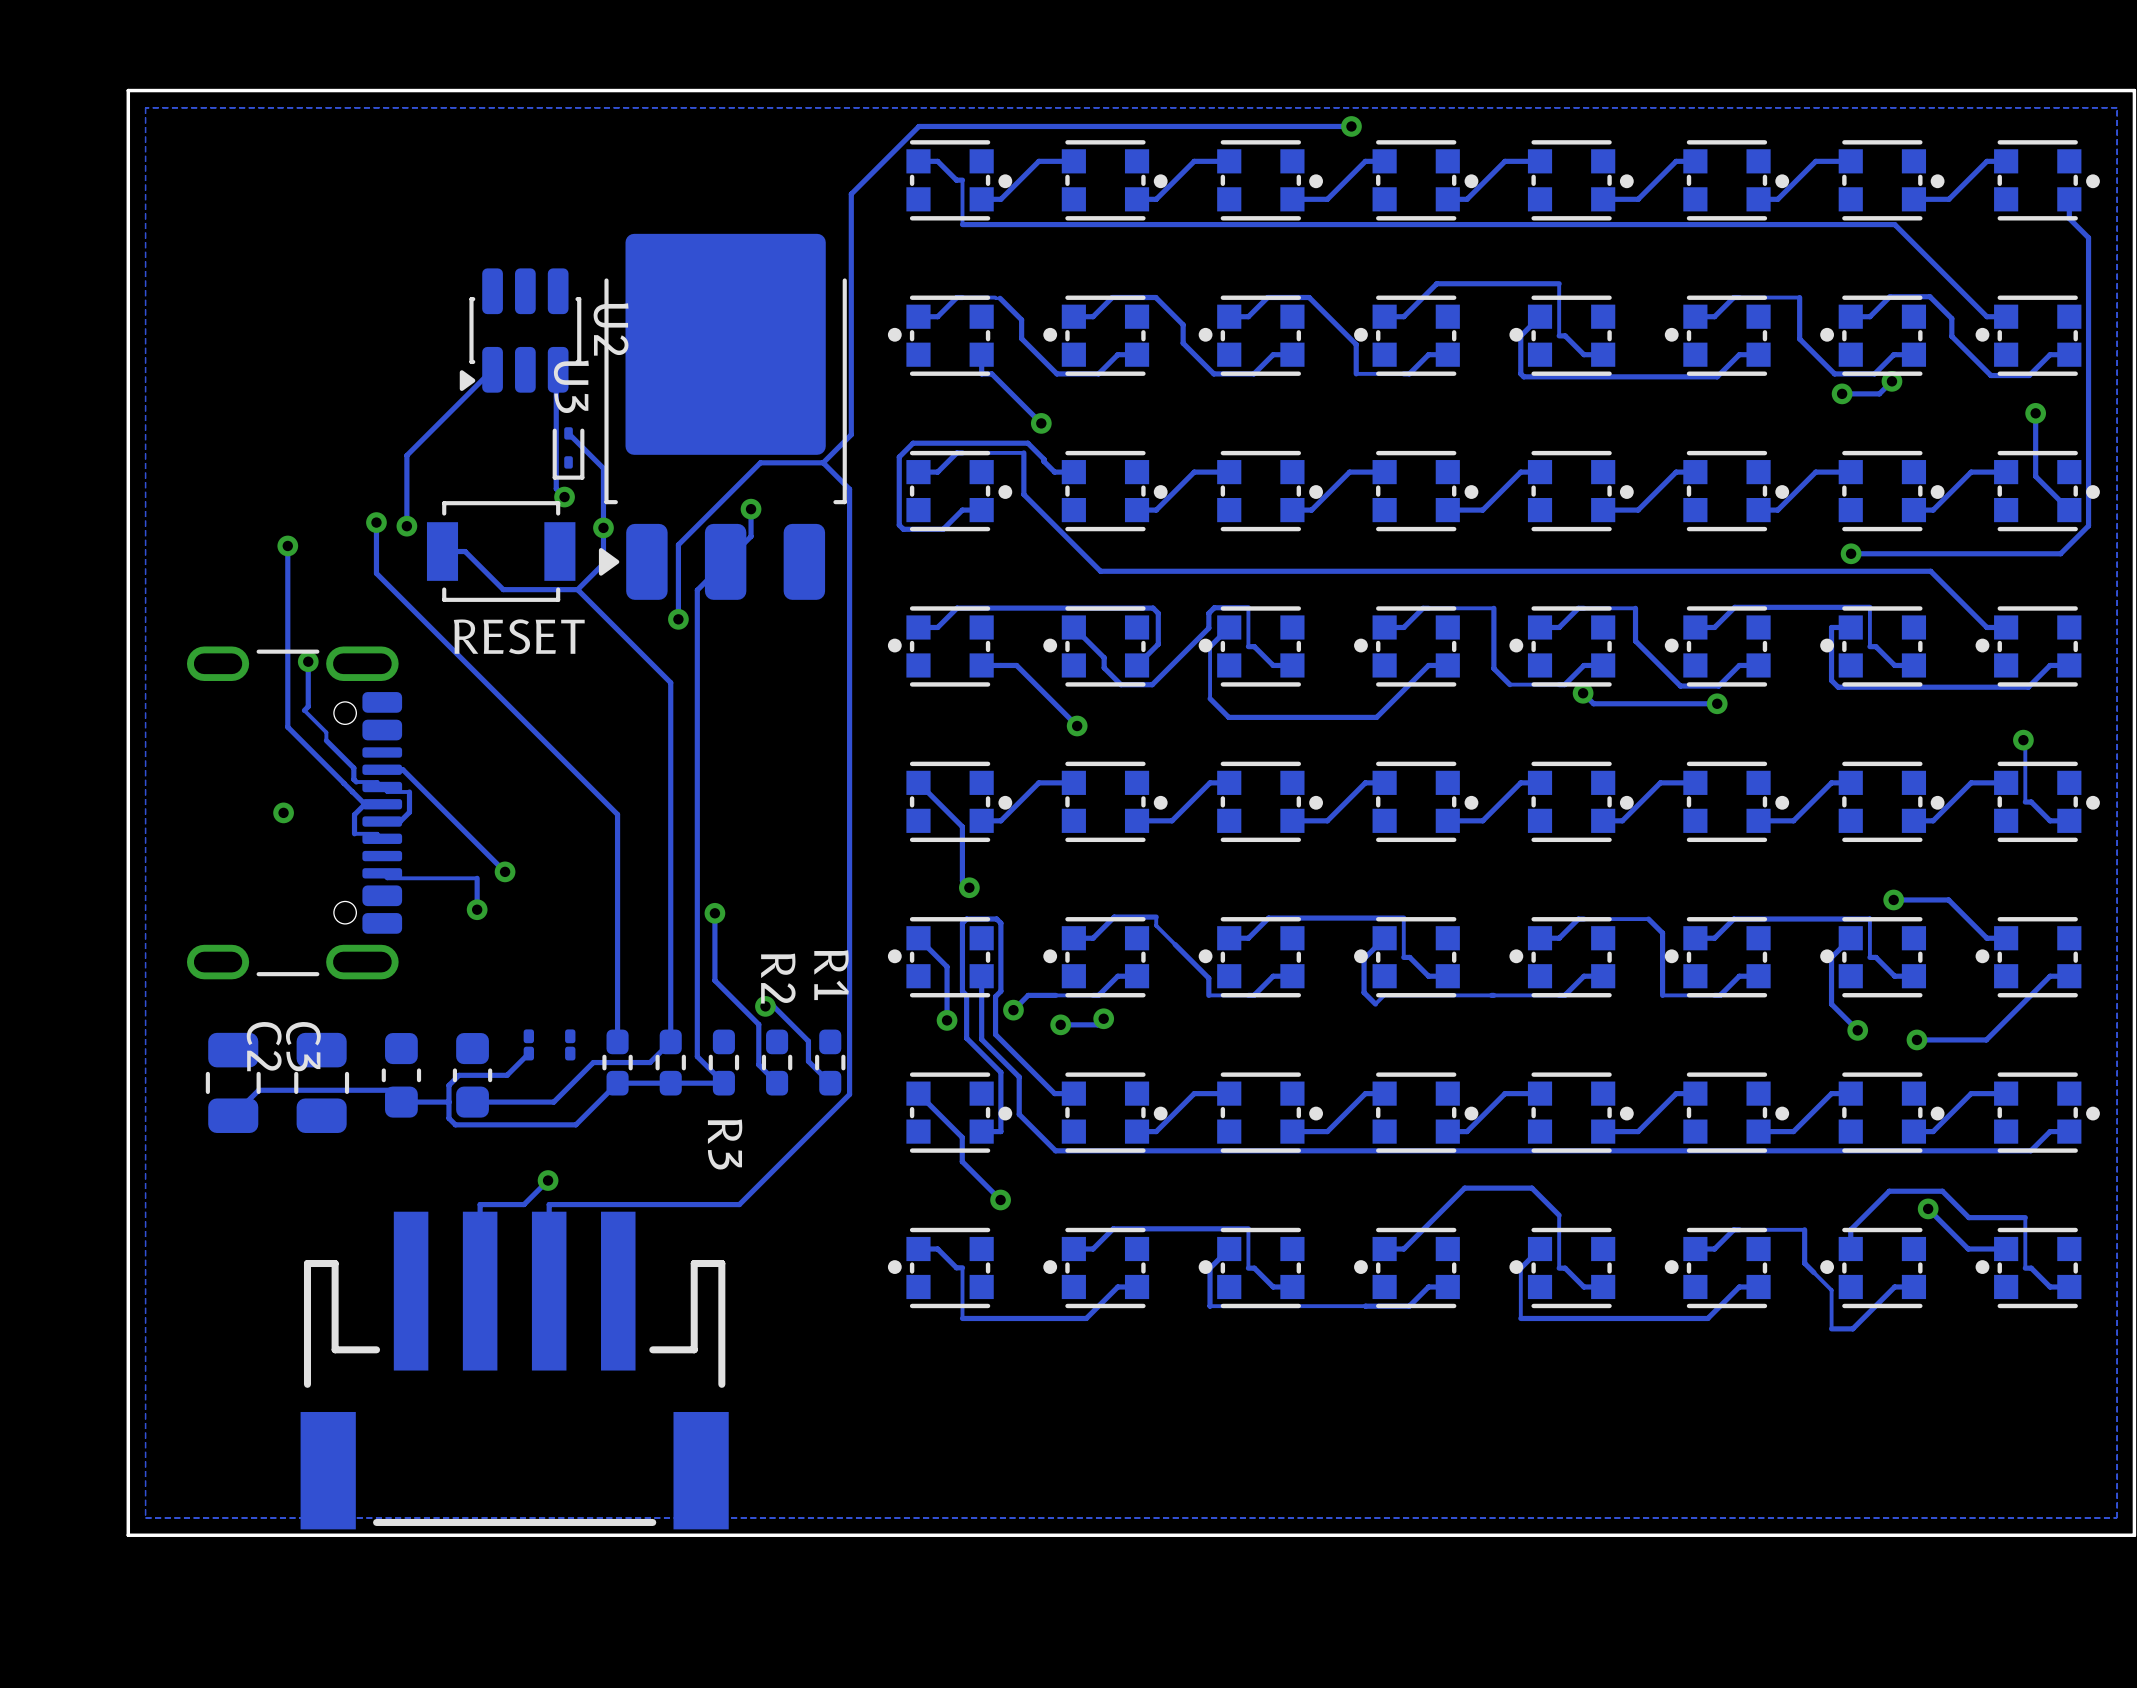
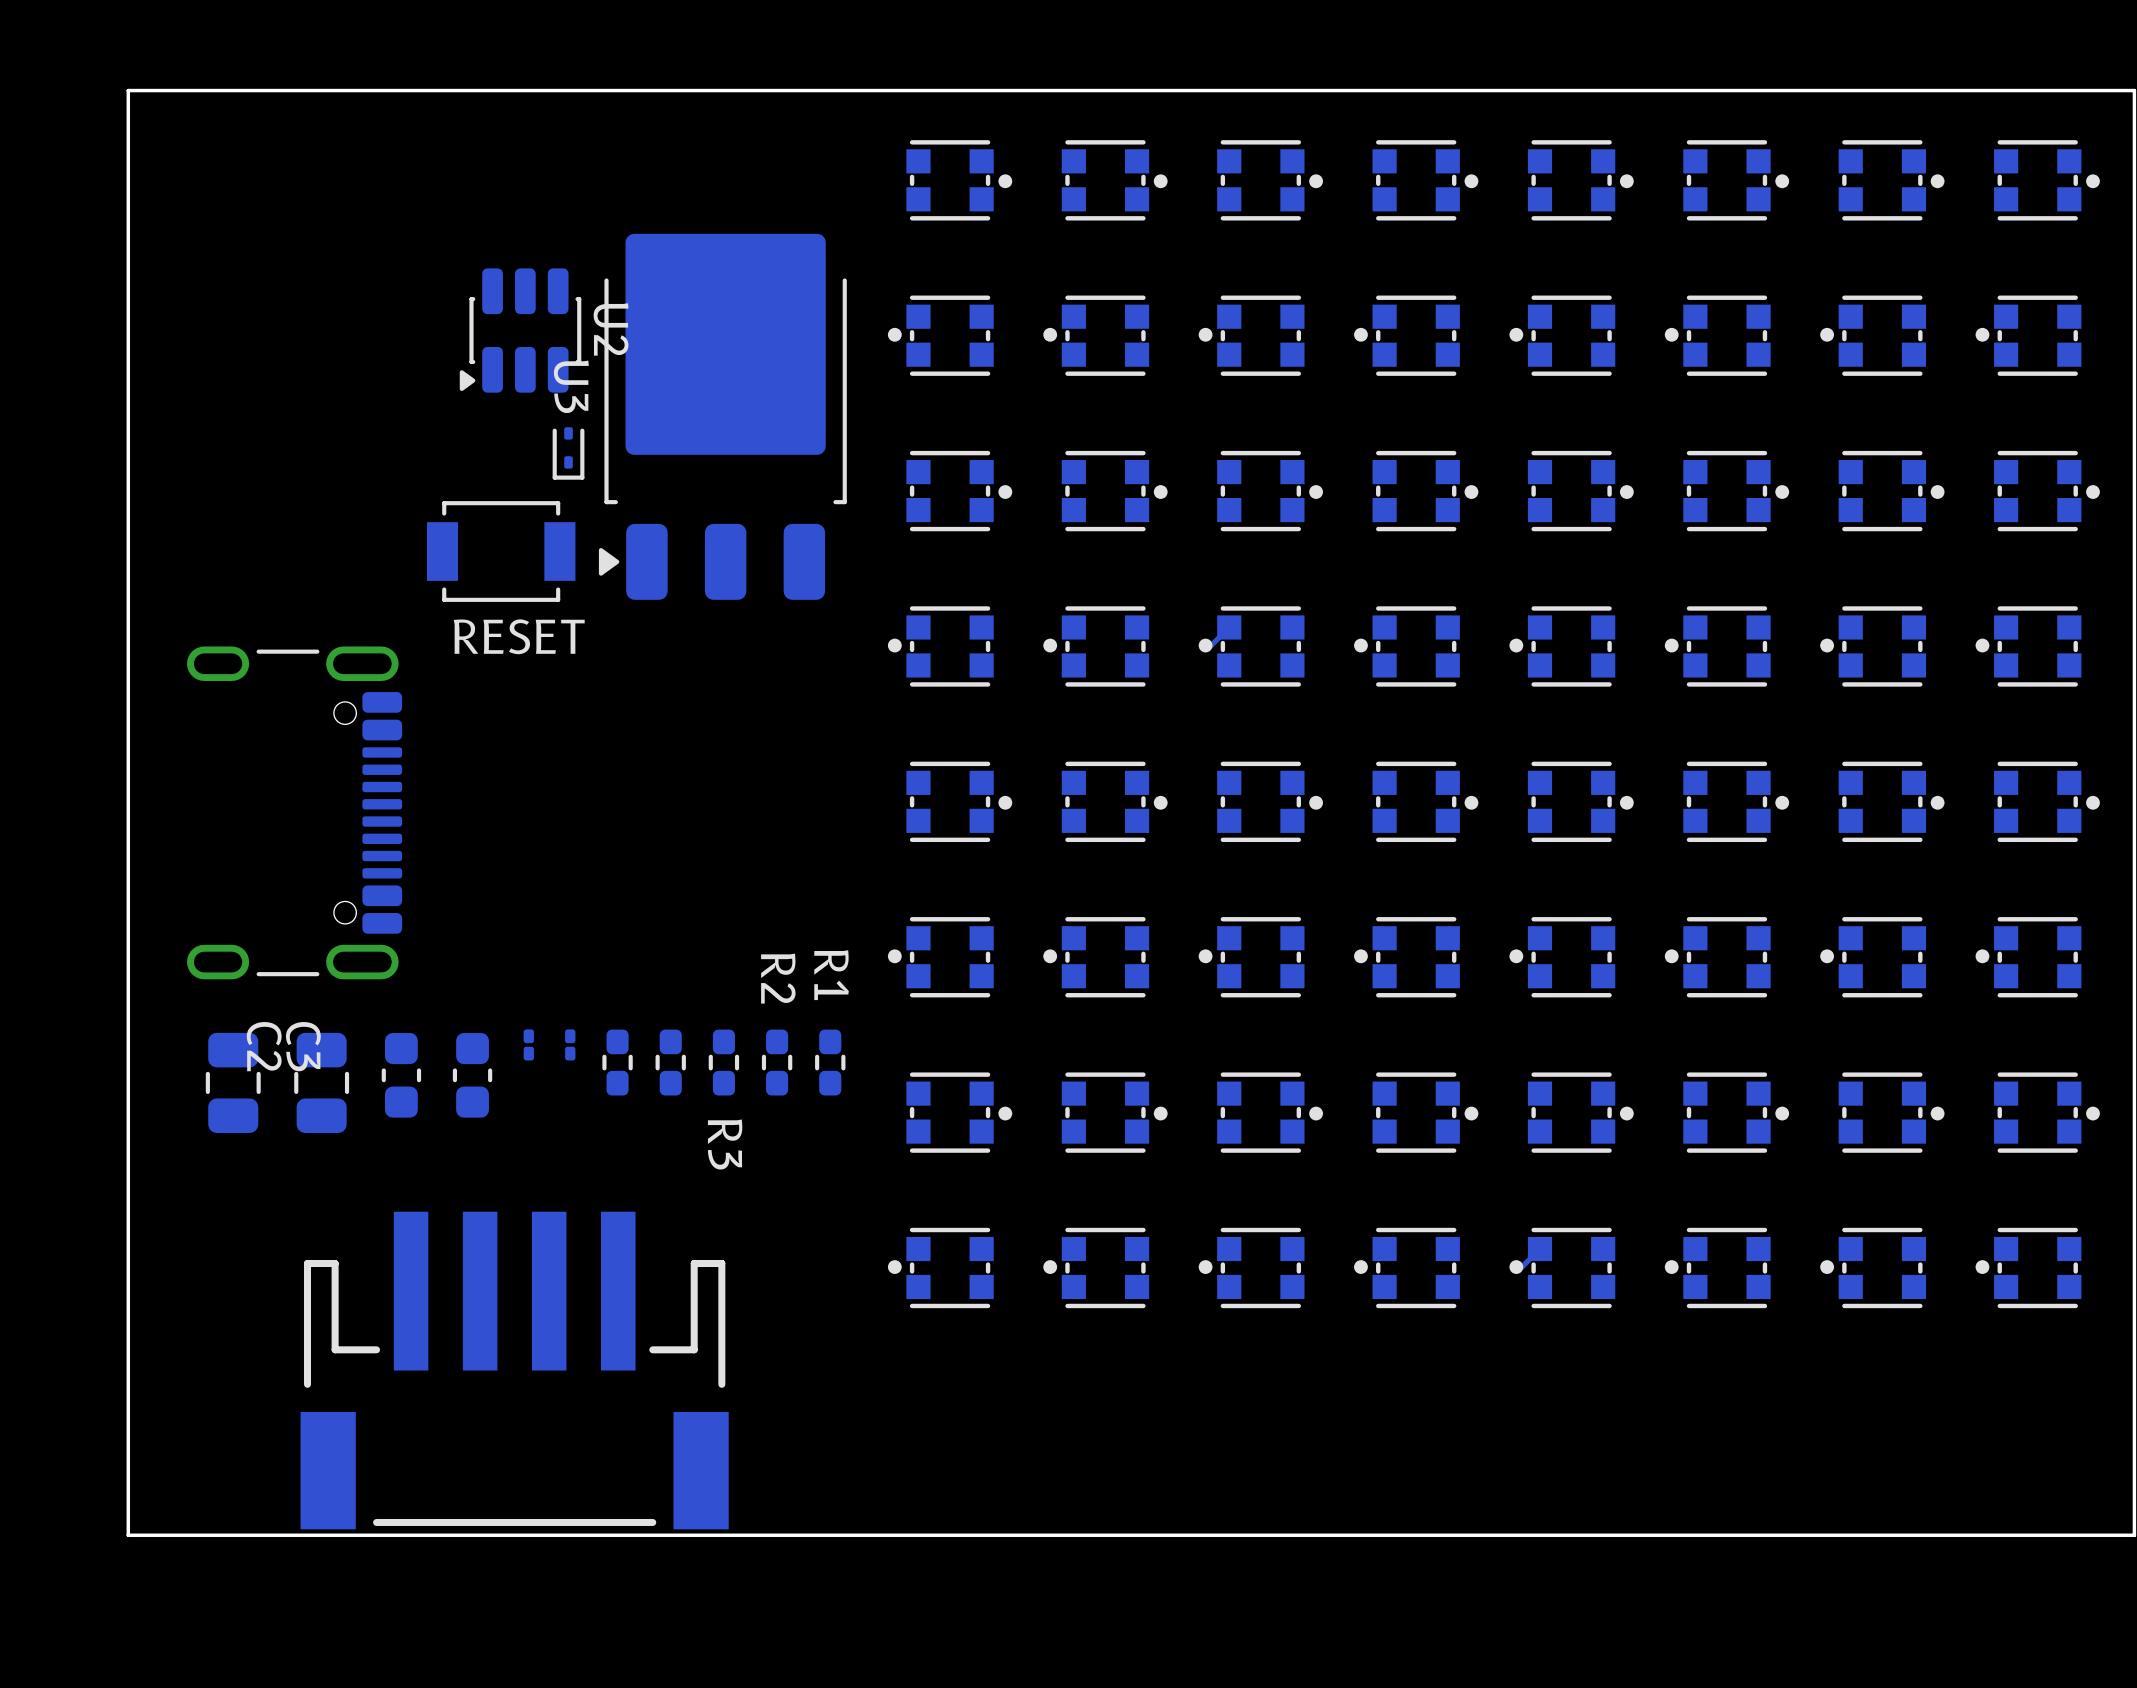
zone outline: (2117, 107) (145, 107) (145, 1517) (2117, 1517) (2117, 107) -> none
track: (1351, 126) (918, 126) (851, 194) (851, 434) (823, 462) -> none
via: (1351, 126) -> none
track: (918, 161) (937, 161) (956, 180) (962, 180) (962, 224) (1894, 224) (1986, 316) (2006, 316) -> none
track: (1073, 161) (1038, 161) (1000, 199) (981, 199) -> none
track: (1229, 161) (1194, 161) (1156, 199) (1137, 199) -> none
track: (1384, 161) (1365, 161) (1327, 199) (1292, 199) -> none
track: (1540, 161) (1505, 161) (1467, 199) (1447, 199) -> none
track: (1695, 161) (1676, 161) (1638, 199) (1603, 199) -> none
track: (1850, 161) (1815, 161) (1777, 199) (1758, 199) -> none
track: (2006, 161) (1986, 161) (1948, 199) (1913, 199) -> none
track: (2069, 199) (2069, 218) (2088, 237) (2088, 525) (2060, 553) (1851, 553) -> none
track: (918, 316) (937, 316) (956, 297) (1000, 298) (1021, 319) (1021, 338) (1056, 373) (1098, 373) (1117, 354) (1137, 354) -> none
track: (1073, 316) (1093, 316) (1112, 297) (1155, 297) (1183, 324) (1183, 343) (1213, 373) (1253, 373) (1273, 354) (1292, 354) -> none
track: (1229, 316) (1248, 316) (1267, 297) (1309, 297) (1356, 344) (1356, 373) (1409, 373) (1428, 354) (1447, 354) -> none
track: (1384, 316) (1403, 316) (1436, 283) (1559, 283) (1559, 335) (1565, 335) (1583, 354) (1603, 354) -> none
track: (1540, 316) (1520, 335) (1520, 373) (1523, 376) (1717, 376) (1739, 354) (1758, 354) -> none
track: (1695, 316) (1714, 316) (1733, 297) (1799, 297) (1799, 338) (1834, 373) (1874, 373) (1893, 354) (1913, 354) -> none
track: (1850, 316) (1869, 316) (1889, 296) (1929, 296) (1951, 318) (1951, 336) (1990, 375) (2029, 375) (2050, 354) (2069, 354) -> none
track: (981, 354) (981, 373) (991, 373) (1041, 423) -> none
track: (492, 369) (406, 455) (406, 526) -> none
track: (558, 369) (556, 371) (556, 488) (564, 497) -> none
track: (1891, 381) (1879, 393) (1842, 393) -> none
via: (1891, 381) -> none
via: (1842, 393) -> none
track: (2035, 413) (2035, 476) (2069, 510) -> none
via: (2035, 413) -> none
via: (1041, 423) -> none
track: (568, 433) (603, 468) (603, 563) (577, 589) -> none
track: (823, 462) (849, 489) (849, 1094) (739, 1204) (549, 1204) (549, 1291) -> none
track: (823, 462) (760, 462) (678, 544) (678, 619) -> none
track: (918, 472) (937, 472) (956, 452) (1023, 452) (1023, 494) (1100, 571) (1930, 571) (1986, 627) (2006, 627) -> none
track: (1073, 472) (1054, 472) (1027, 443) (913, 443) (899, 457) (899, 525) (903, 529) (943, 529) (962, 510) (981, 510) -> none
track: (1229, 472) (1194, 472) (1156, 510) (1137, 510) -> none
track: (1384, 472) (1349, 472) (1311, 510) (1292, 510) -> none
track: (1540, 472) (1520, 472) (1482, 510) (1447, 510) -> none
track: (1695, 472) (1676, 472) (1638, 510) (1603, 510) -> none
track: (1850, 472) (1815, 472) (1777, 510) (1758, 510) -> none
track: (2006, 472) (1971, 472) (1933, 510) (1913, 510) -> none
via: (564, 497) -> none
track: (751, 509) (751, 536) (697, 590) (697, 1056) (723, 1083) (617, 1083) (575, 1124) (455, 1124) (448, 1118) (448, 1085) (459, 1075) (507, 1075) (528, 1053) -> none
via: (751, 509) -> none
track: (376, 522) (376, 573) (617, 814) (617, 1041) -> none
via: (376, 522) -> none
via: (406, 526) -> none
via: (603, 527) -> none
track: (287, 545) (287, 727) (364, 804) -> none
via: (287, 545) -> none
track: (442, 551) (465, 551) (503, 589) (577, 589) -> none
via: (1851, 553) -> none
track: (577, 589) (670, 682) (670, 1041) (650, 1062) (593, 1062) (553, 1102) (472, 1102) -> none
via: (678, 619) -> none
track: (918, 627) (937, 627) (957, 608) (1153, 608) (1158, 613) (1158, 644) (1137, 665) -> none
track: (1073, 627) (1104, 657) (1104, 667) (1121, 684) (1152, 684) (1208, 628) (1208, 613) (1214, 607) (1248, 607) (1248, 646) (1254, 646) (1273, 665) (1292, 665) -> none
track: (1384, 627) (1403, 627) (1423, 608) (1493, 608) (1493, 668) (1509, 684) (1564, 684) (1583, 665) (1603, 665) -> none
track: (1540, 627) (1559, 627) (1578, 608) (1635, 608) (1635, 641) (1680, 686) (1718, 686) (1739, 665) (1758, 665) -> none
track: (1695, 627) (1714, 627) (1734, 607) (1869, 607) (1869, 646) (1875, 646) (1894, 665) (1913, 665) -> none
track: (1850, 627) (1831, 627) (1831, 680) (1838, 687) (2028, 687) (2050, 665) (2069, 665) -> none
track: (1210, 646) (1210, 698) (1228, 717) (1376, 717) (1428, 665) (1447, 665) -> none
track: (308, 661) (308, 706) (304, 710) (326, 732) (326, 740) (353, 768) (353, 779) (356, 782) (377, 782) (387, 791) (409, 791) (409, 812) (400, 821) (382, 821) -> none
via: (308, 661) -> none
track: (981, 665) (1016, 665) (1077, 725) -> none
track: (1583, 693) (1593, 703) (1717, 703) -> none
via: (1583, 693) -> none
via: (1717, 703) -> none
via: (1077, 725) -> none
track: (2023, 740) (2025, 740) (2025, 802) (2031, 802) (2050, 820) (2069, 820) -> none
via: (2023, 740) -> none
track: (382, 769) (402, 769) (505, 871) -> none
track: (918, 782) (962, 826) (962, 880) (969, 887) -> none
track: (1073, 782) (1038, 782) (1000, 820) (981, 820) -> none
track: (1229, 782) (1210, 782) (1172, 820) (1137, 820) -> none
track: (1384, 782) (1365, 782) (1327, 820) (1292, 820) -> none
track: (1540, 782) (1520, 782) (1482, 820) (1447, 820) -> none
track: (1695, 782) (1660, 782) (1622, 820) (1603, 820) -> none
track: (1850, 782) (1831, 782) (1793, 820) (1758, 820) -> none
track: (2006, 782) (1971, 782) (1933, 820) (1913, 820) -> none
track: (364, 804) (354, 814) (354, 833) (377, 833) (382, 838) -> none
via: (283, 812) -> none
via: (505, 871) -> none
track: (382, 873) (387, 878) (477, 878) (477, 909) -> none
via: (969, 887) -> none
track: (1893, 899) (1948, 899) (1986, 938) (2006, 938) -> none
via: (1893, 899) -> none
via: (477, 909) -> none
track: (714, 913) (714, 980) (758, 1024) (758, 1064) (777, 1083) -> none
via: (714, 913) -> none
track: (918, 938) (947, 966) (947, 1020) -> none
track: (1073, 938) (1093, 938) (1114, 917) (1156, 917) (1156, 925) (1208, 978) (1208, 995) (1254, 995) (1273, 976) (1292, 976) -> none
track: (1229, 938) (1248, 938) (1268, 918) (1403, 918) (1403, 957) (1409, 957) (1428, 976) (1447, 976) -> none
track: (1384, 938) (1364, 958) (1364, 992) (1375, 1004) (1384, 995) (1564, 995) (1583, 976) (1603, 976) -> none
track: (1540, 938) (1559, 938) (1578, 919) (1648, 919) (1662, 933) (1662, 995) (1720, 995) (1739, 976) (1758, 976) -> none
track: (1695, 938) (1714, 938) (1733, 919) (1869, 919) (1869, 957) (1875, 957) (1894, 976) (1913, 976) -> none
track: (1850, 938) (1831, 957) (1831, 1004) (1857, 1030) -> none
track: (981, 976) (981, 1039) (1019, 1077) (1019, 1114) (1055, 1150) (2030, 1150) (2050, 1131) (2069, 1131) -> none
track: (1137, 976) (1117, 976) (1098, 995) (1028, 995) (1013, 1010) -> none
track: (2069, 976) (2050, 976) (1986, 1039) (1916, 1039) -> none
track: (765, 1006) (773, 1006) (808, 1041) (808, 1061) (830, 1083) -> none
via: (765, 1006) -> none
via: (1013, 1010) -> none
track: (1103, 1018) (1097, 1024) (1060, 1024) -> none
via: (1103, 1018) -> none
via: (947, 1020) -> none
via: (1060, 1024) -> none
via: (1857, 1030) -> none
via: (1916, 1039) -> none
track: (918, 1093) (962, 1137) (962, 1161) (1000, 1199) -> none
track: (1073, 1093) (1054, 1093) (995, 1034) (995, 996) (1000, 991) (1000, 923) (996, 919) (966, 919) (962, 923) (962, 991) (966, 995) (966, 1038) (1000, 1072) (1000, 1131) (981, 1131) -> none
track: (1229, 1093) (1194, 1093) (1156, 1131) (1137, 1131) -> none
track: (1384, 1093) (1365, 1093) (1327, 1131) (1292, 1131) -> none
track: (1540, 1093) (1505, 1093) (1467, 1131) (1447, 1131) -> none
track: (1695, 1093) (1676, 1093) (1638, 1131) (1603, 1131) -> none
track: (1850, 1093) (1831, 1093) (1793, 1131) (1758, 1131) -> none
track: (2006, 1093) (1971, 1093) (1933, 1131) (1913, 1131) -> none
track: (448, 1102) (401, 1102) (389, 1090) (258, 1090) (233, 1115) -> none
track: (548, 1180) (524, 1204) (480, 1204) (480, 1291) -> none
via: (548, 1180) -> none
via: (1000, 1199) -> none
track: (1928, 1208) (1968, 1249) (2006, 1249) -> none
via: (1928, 1208) -> none
track: (918, 1249) (937, 1249) (956, 1267) (962, 1267) (962, 1318) (1086, 1318) (1117, 1286) (1137, 1286) -> none
track: (1073, 1249) (1093, 1249) (1113, 1228) (1248, 1228) (1248, 1268) (1254, 1268) (1273, 1286) (1292, 1286) -> none
track: (1229, 1249) (1210, 1268) (1210, 1306) -> none
track: (1384, 1249) (1403, 1249) (1464, 1188) (1531, 1188) (1559, 1215) (1559, 1268) (1565, 1268) (1583, 1286) (1603, 1286) -> none
track: (1695, 1249) (1714, 1249) (1733, 1229) (1804, 1229) (1804, 1263) (1831, 1290) (1831, 1328) (1852, 1328) (1894, 1286) (1913, 1286) -> none
track: (1850, 1249) (1850, 1229) (1889, 1191) (1942, 1191) (1968, 1217) (2025, 1217) (2025, 1268) (2031, 1268) (2050, 1286) (2069, 1286) -> none
track: (1520, 1267) (1520, 1318) (1707, 1318) (1739, 1286) (1758, 1286) -> none
track: (1447, 1286) (1428, 1286) (1409, 1306) (1210, 1306) -> none

